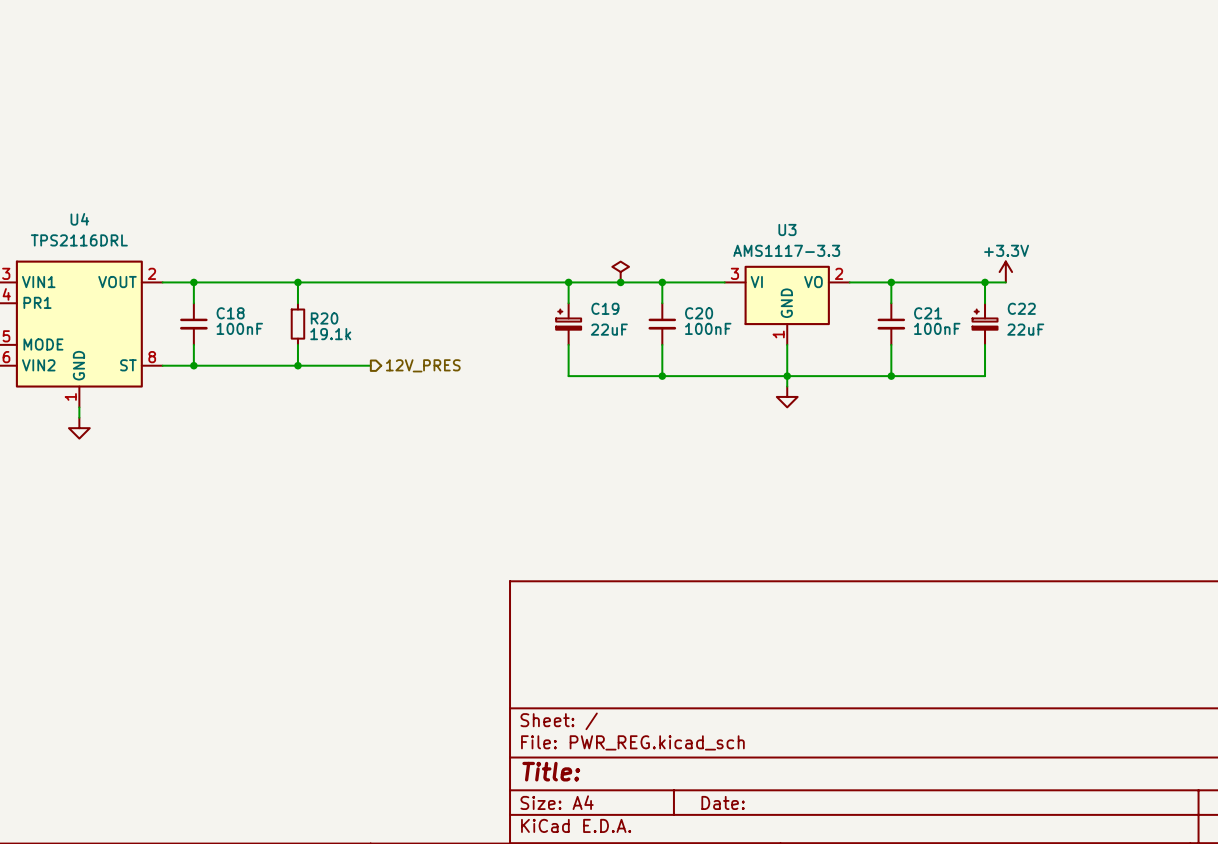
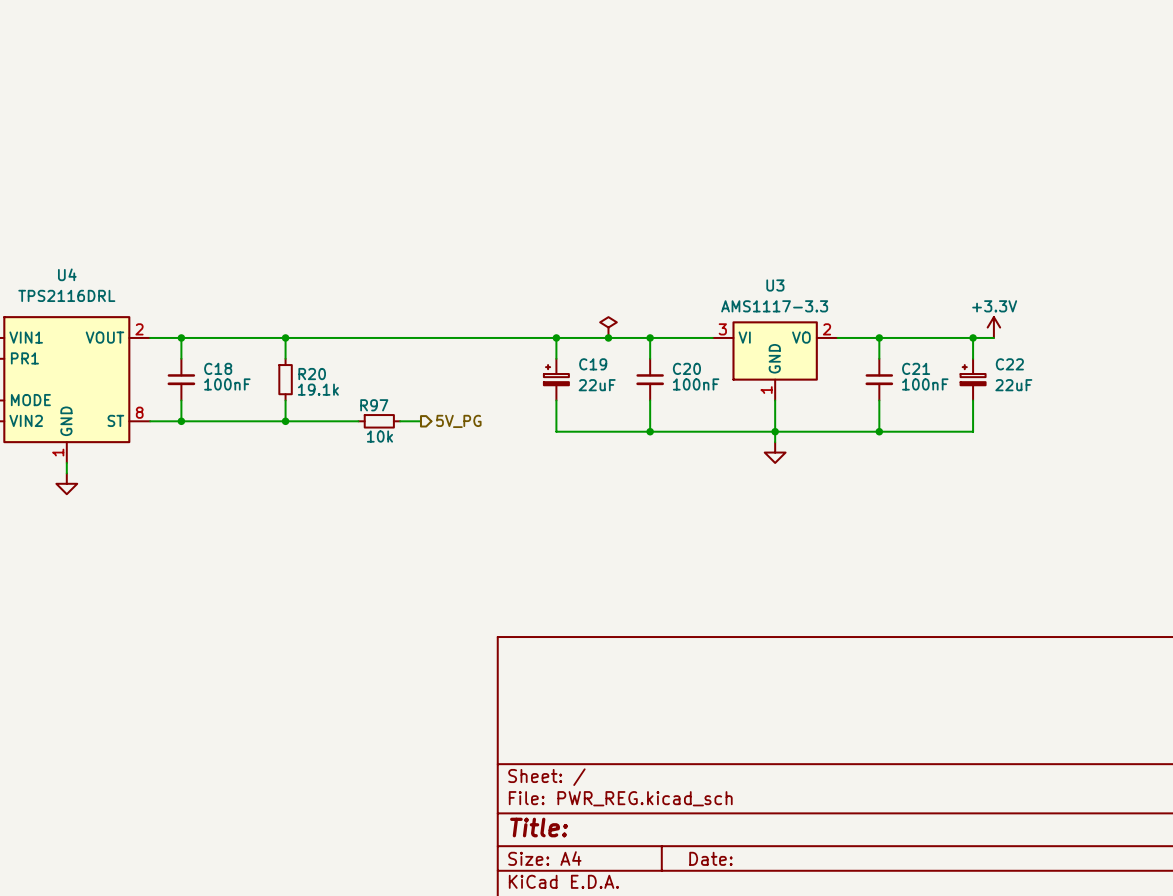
R97: none -> 10k (379, 421)
wire: none -> (400, 421) (420, 421)
hierarchical label: 12V_PRES (423, 365) -> none
hierarchical label: none -> 5V_PG (458, 421)

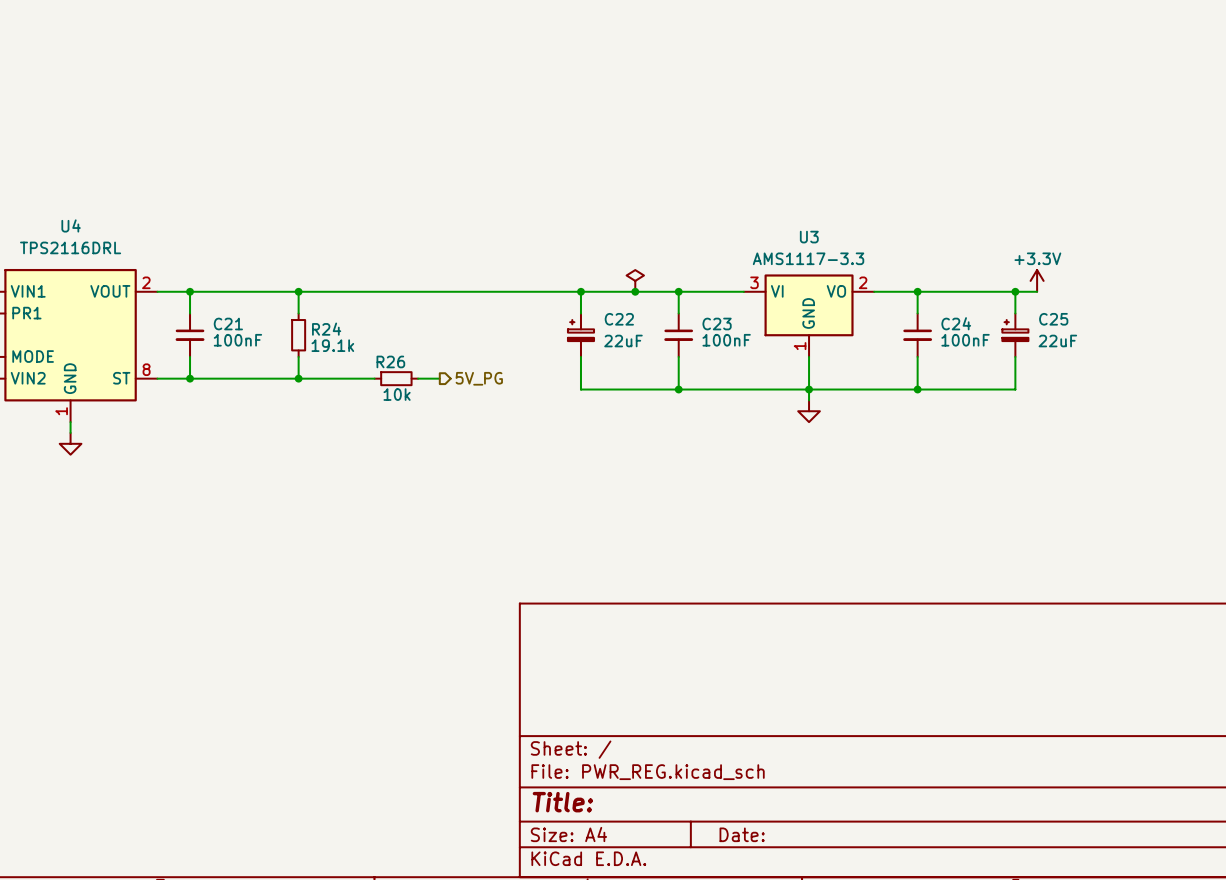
C19 name: C19 (593, 364) -> C22 (619, 319)
C22 name: C22 (1009, 364) -> C25 (1053, 319)
C18 name: C18 (218, 368) -> C21 (228, 324)
C20 name: C20 (686, 368) -> C23 (717, 324)
C21 name: C21 (916, 368) -> C24 (956, 323)
R20 name: R20 (312, 374) -> R24 (326, 329)
R97 name: R97 (374, 405) -> R26 (390, 361)

